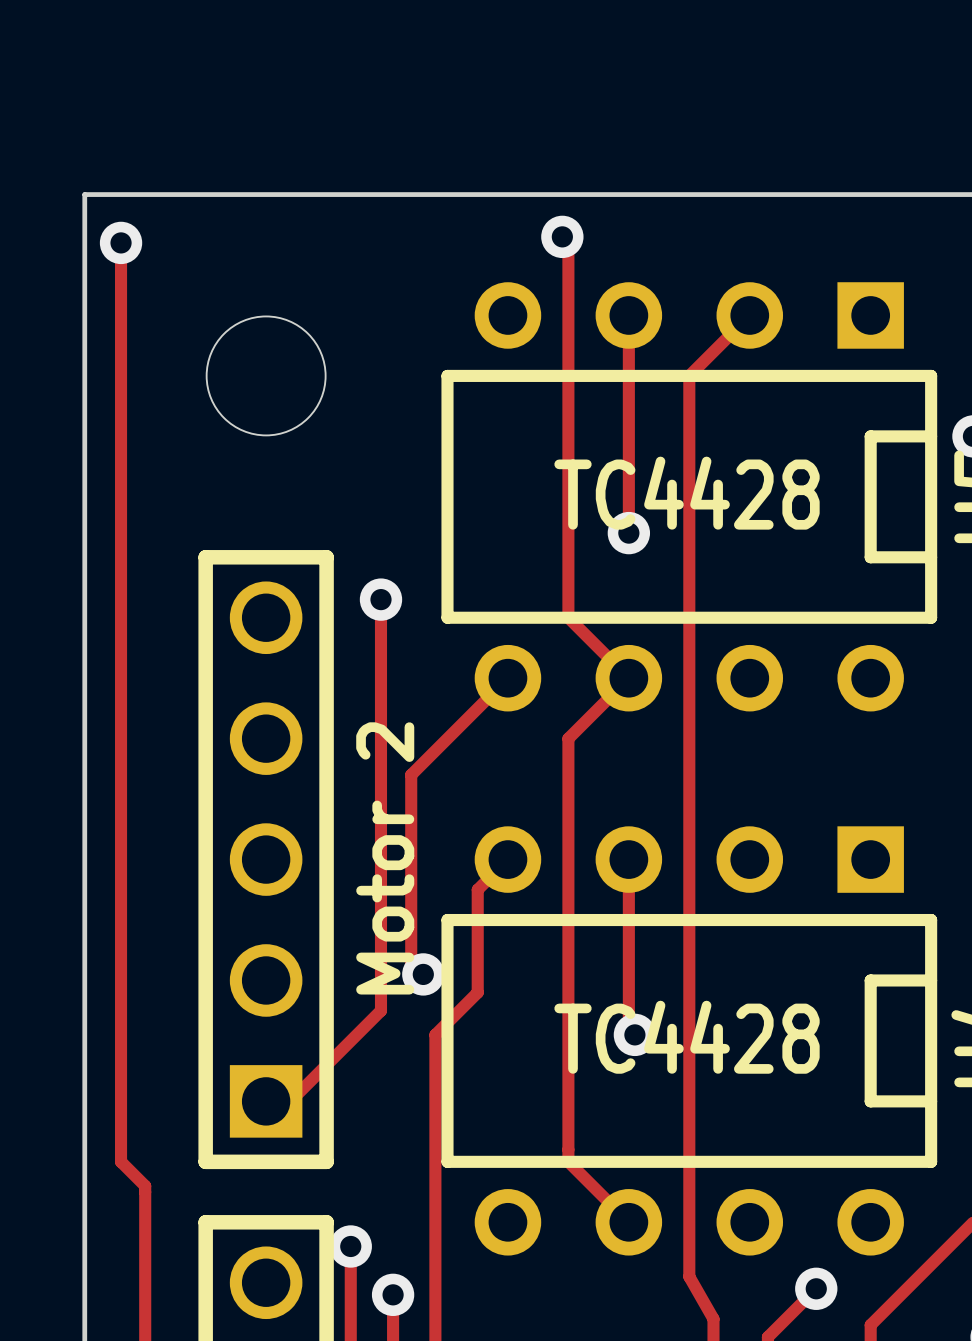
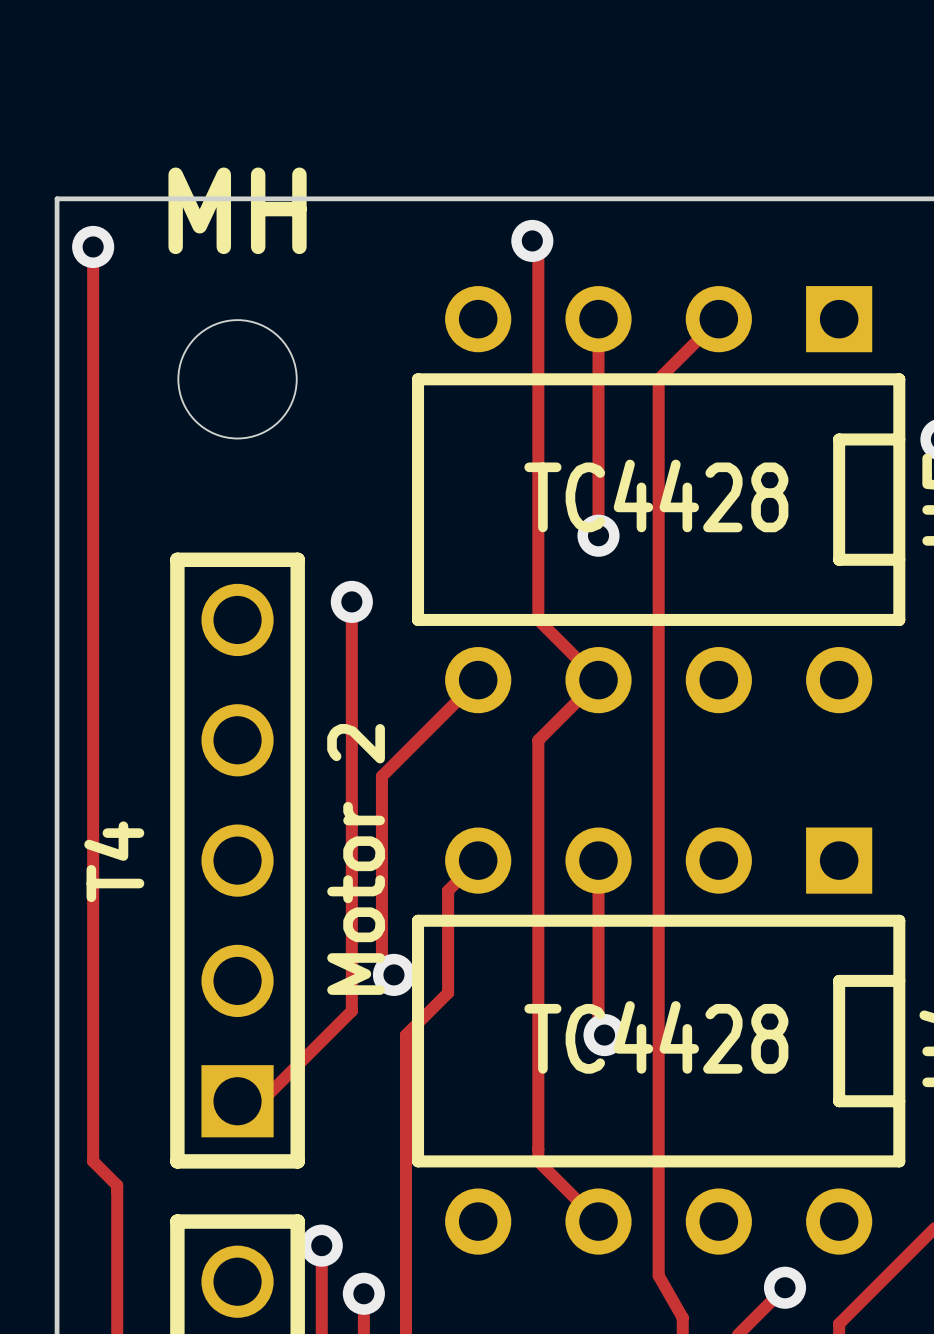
MH name: none -> MH (237, 210)
T4 name: none -> T4 (114, 861)

